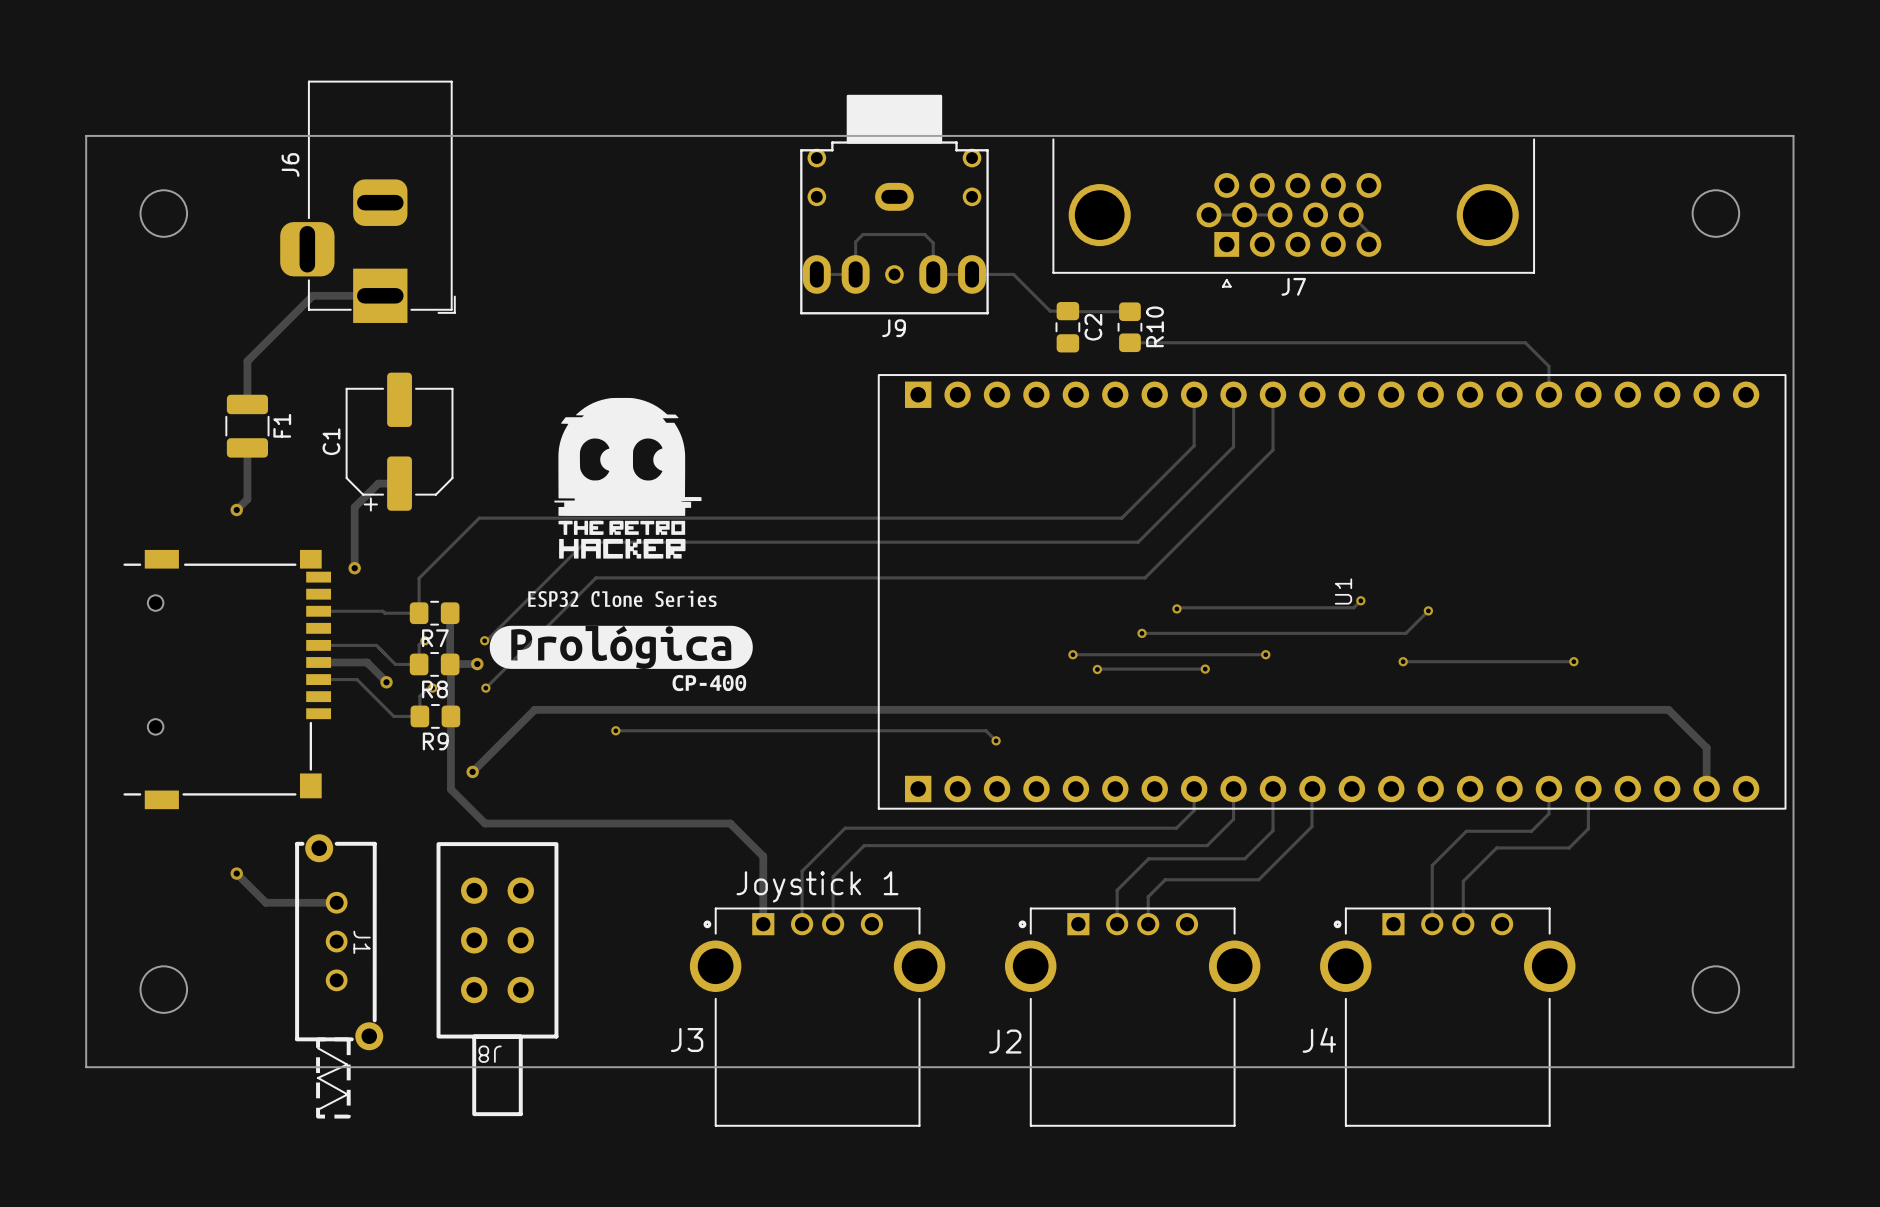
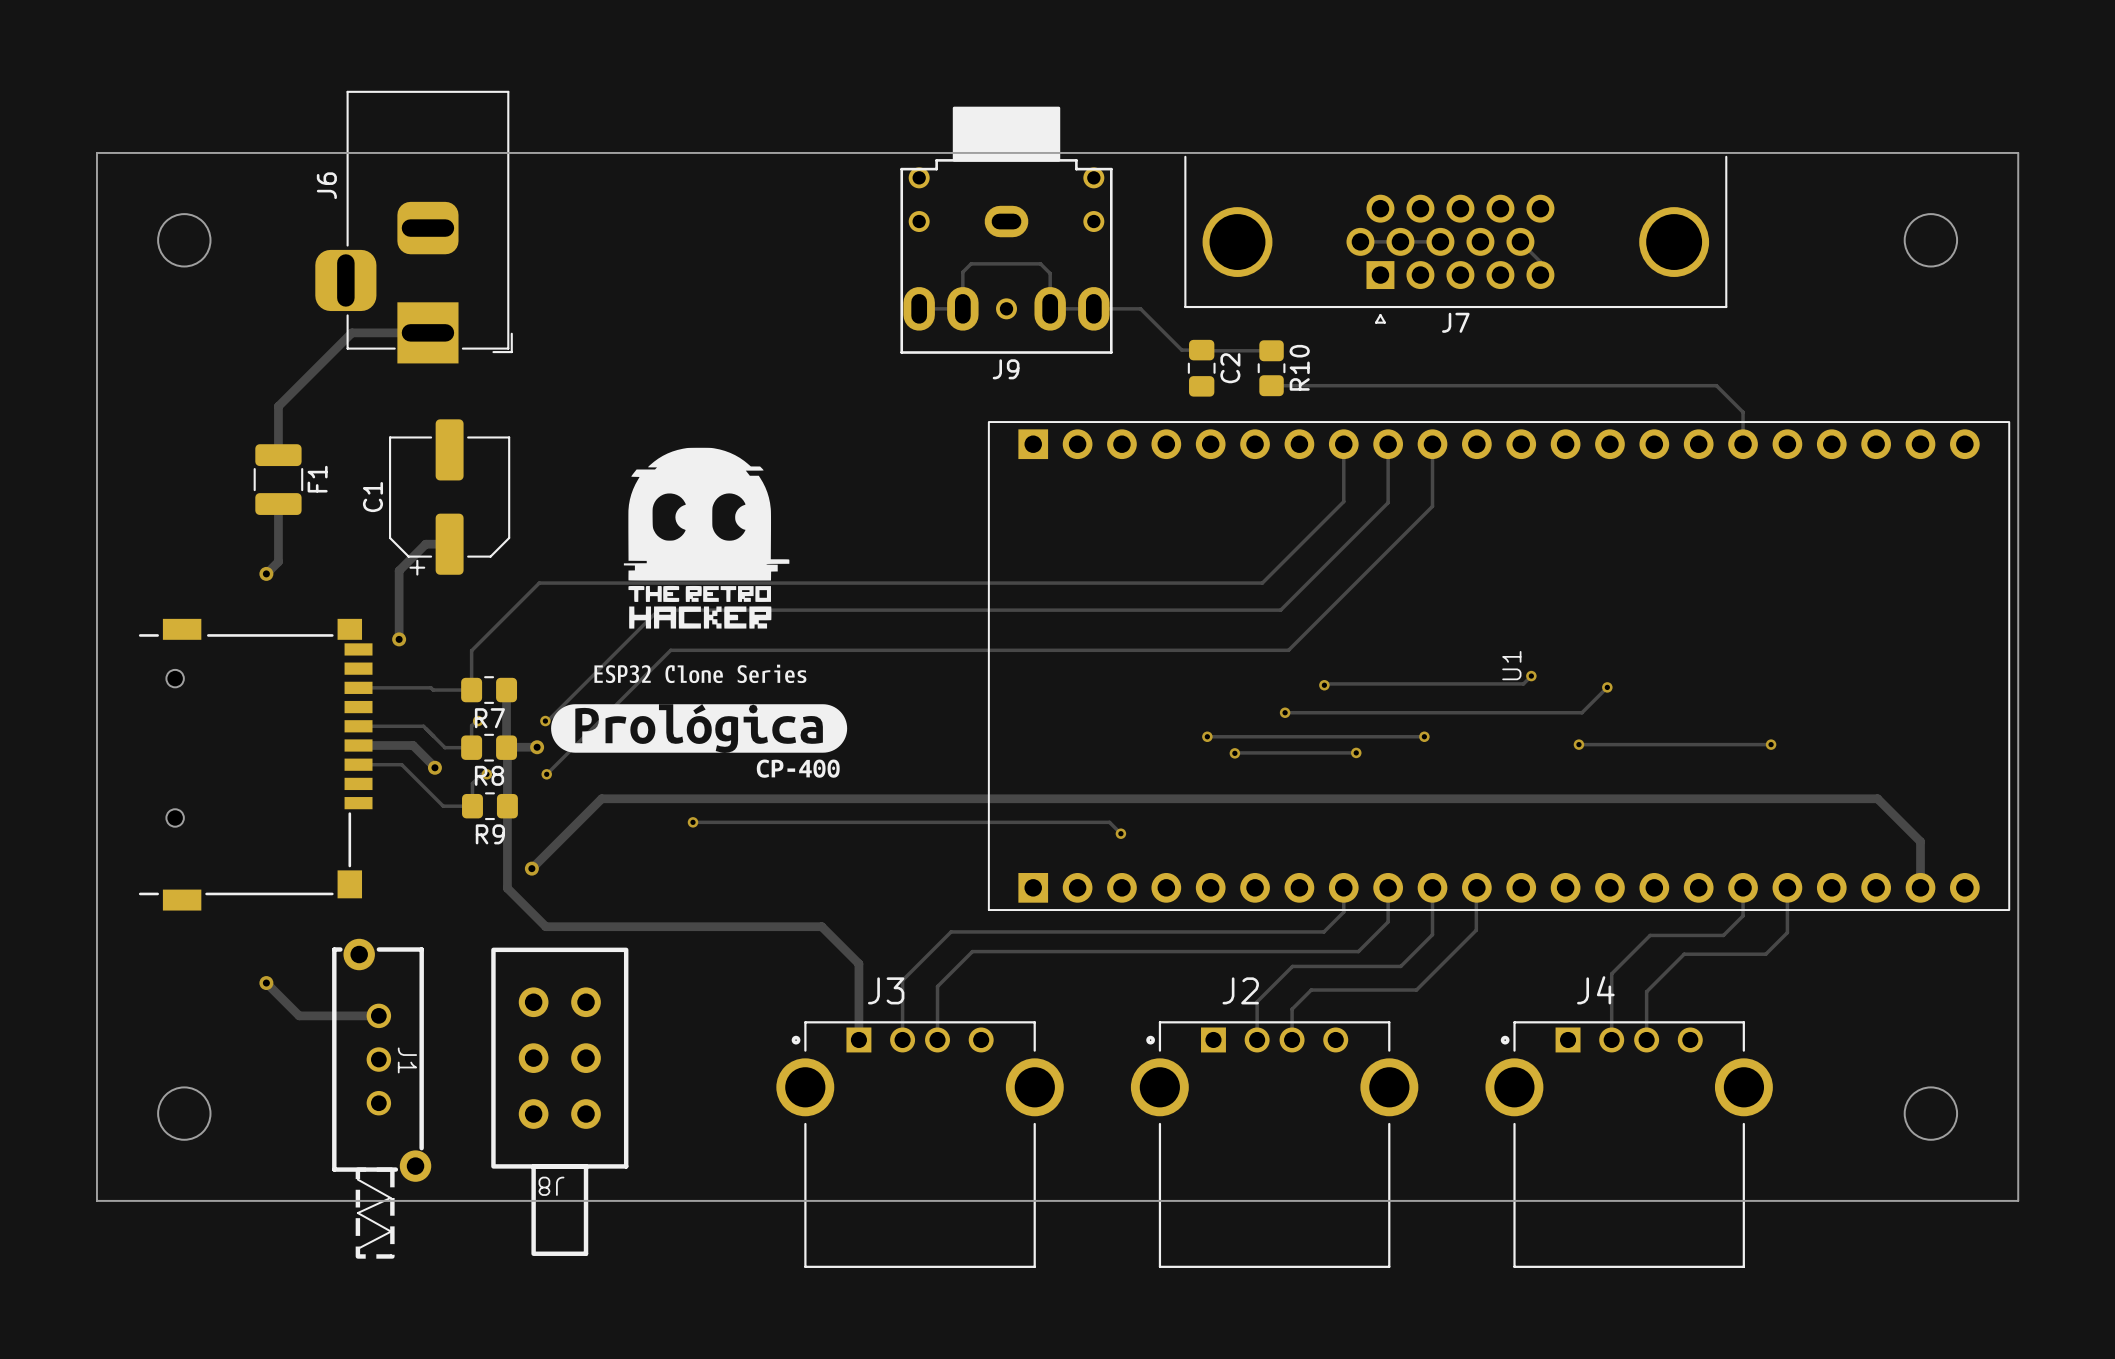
J3 value: Joystick 1 (817, 886) -> none
J3 name position: J3 (687, 1040) -> J3 (886, 990)
J4 name position: J4 (1319, 1040) -> J4 (1595, 990)
J2 name position: J2 (1005, 1041) -> J2 (1240, 990)

